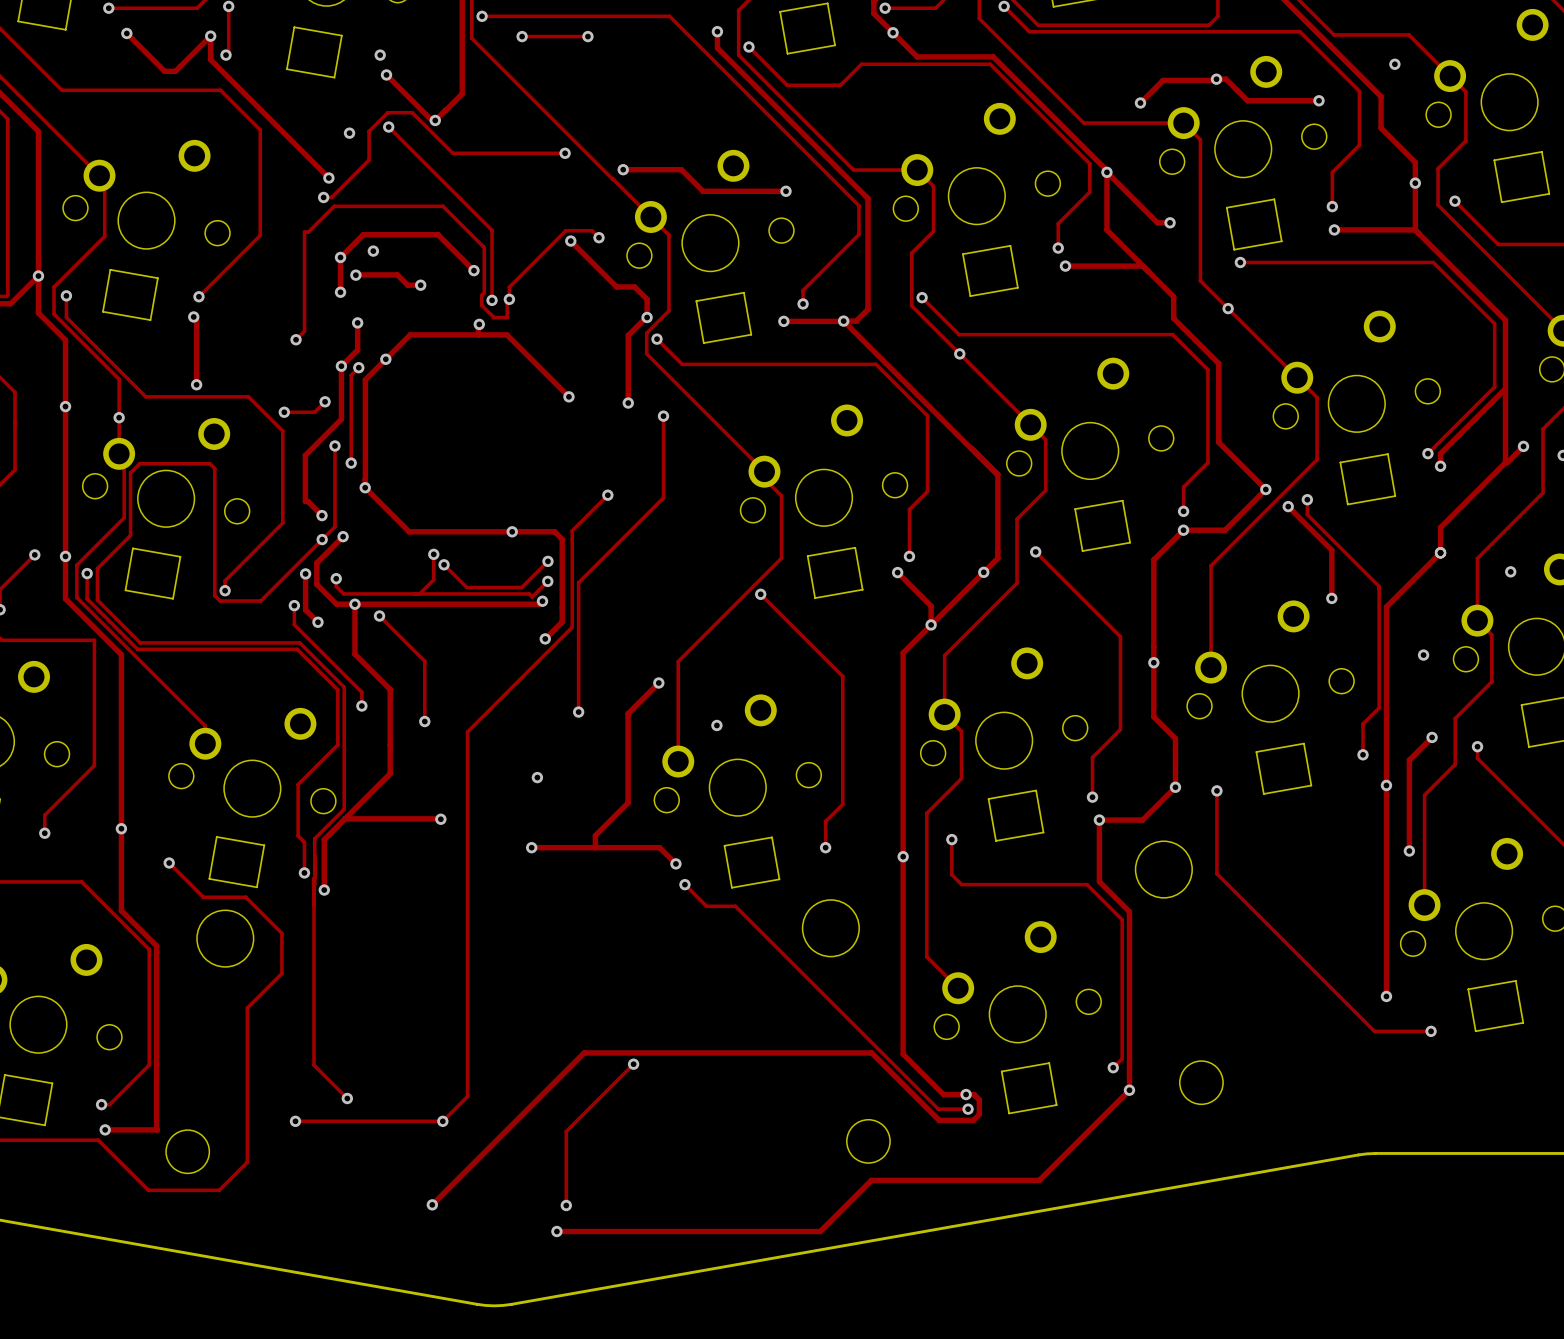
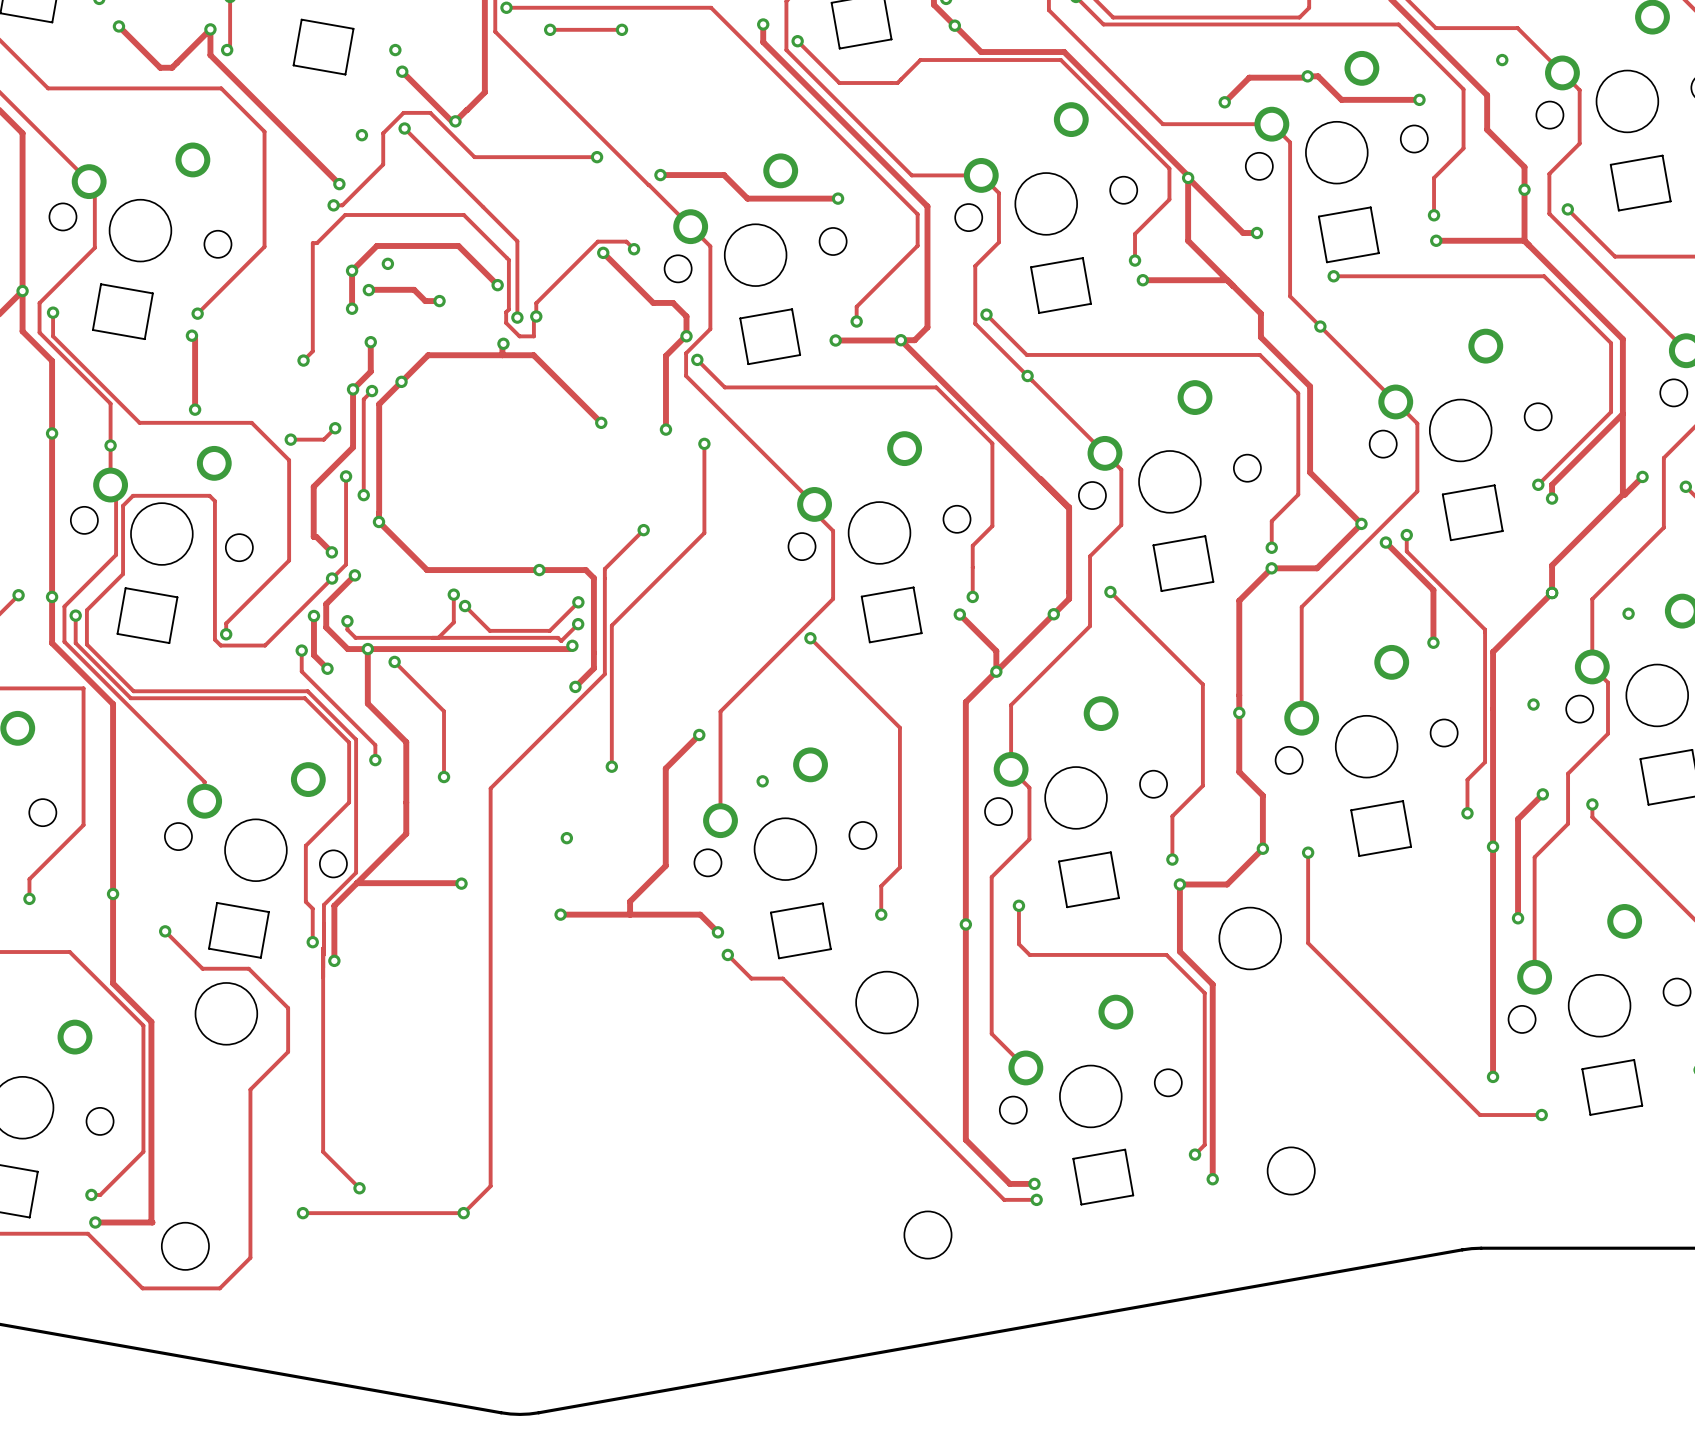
track: (633, 1064) (566, 1131) (566, 1205) -> none
via: (633, 1064) -> none
track: (1129, 1090) (1039, 1180) (871, 1180) (820, 1231) (556, 1231) -> none
track: (966, 1094) (974, 1094) (979, 1099) (979, 1114) (973, 1120) (939, 1120) (871, 1052) (584, 1052) (432, 1204) -> none
via: (432, 1204) -> none
via: (566, 1205) -> none
via: (556, 1231) -> none

